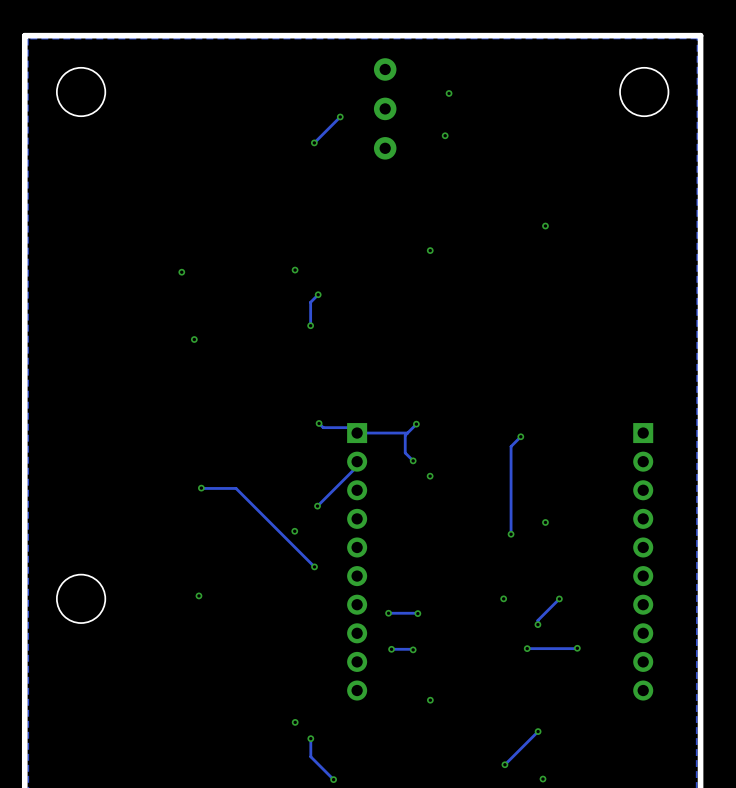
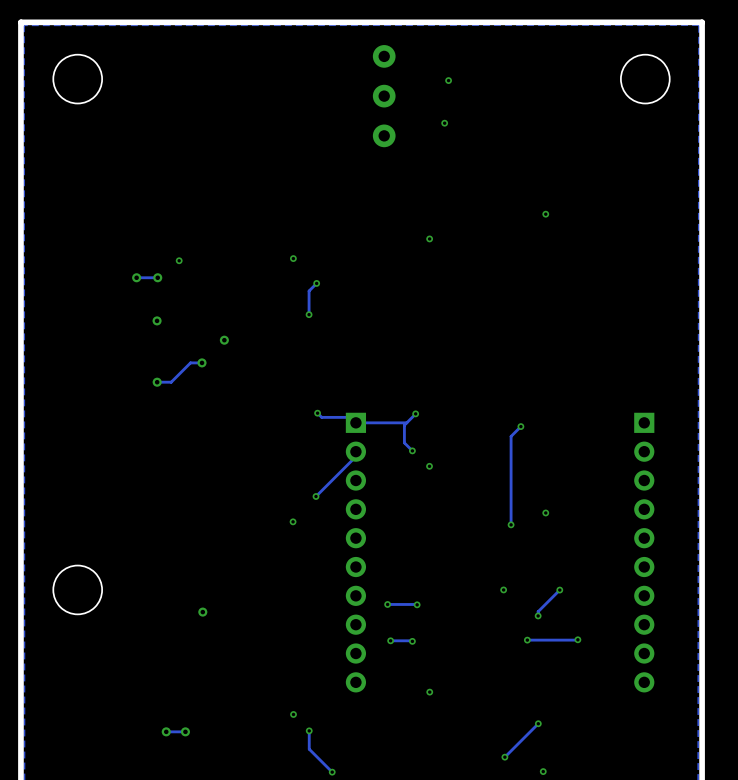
track: (340, 116) (314, 142) -> none
via: (340, 116) -> none
via: (314, 142) -> none
via: none -> (136, 277)
track: none -> (157, 277) (136, 277)
via: none -> (157, 277)
via: none -> (157, 320)
via: (194, 339) -> none
via: none -> (224, 340)
track: none -> (202, 362) (190, 362) (171, 382) (157, 382)
via: none -> (202, 362)
via: none -> (157, 382)
track: (201, 488) (236, 488) (314, 566) -> none
via: (201, 488) -> none
via: (314, 566) -> none
via: (198, 595) -> none
via: none -> (202, 612)
via: none -> (166, 731)
track: none -> (185, 731) (166, 731)
via: none -> (185, 731)

